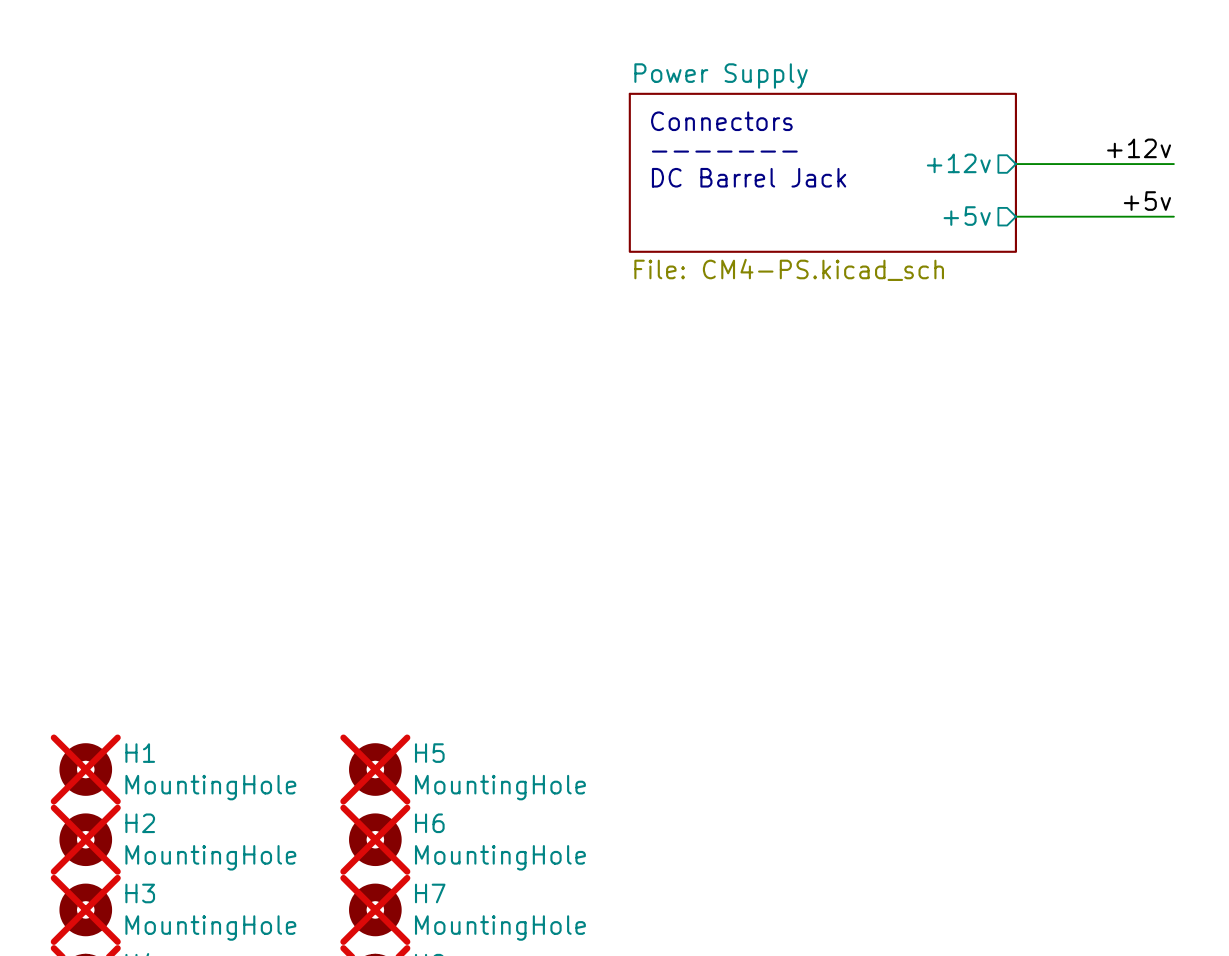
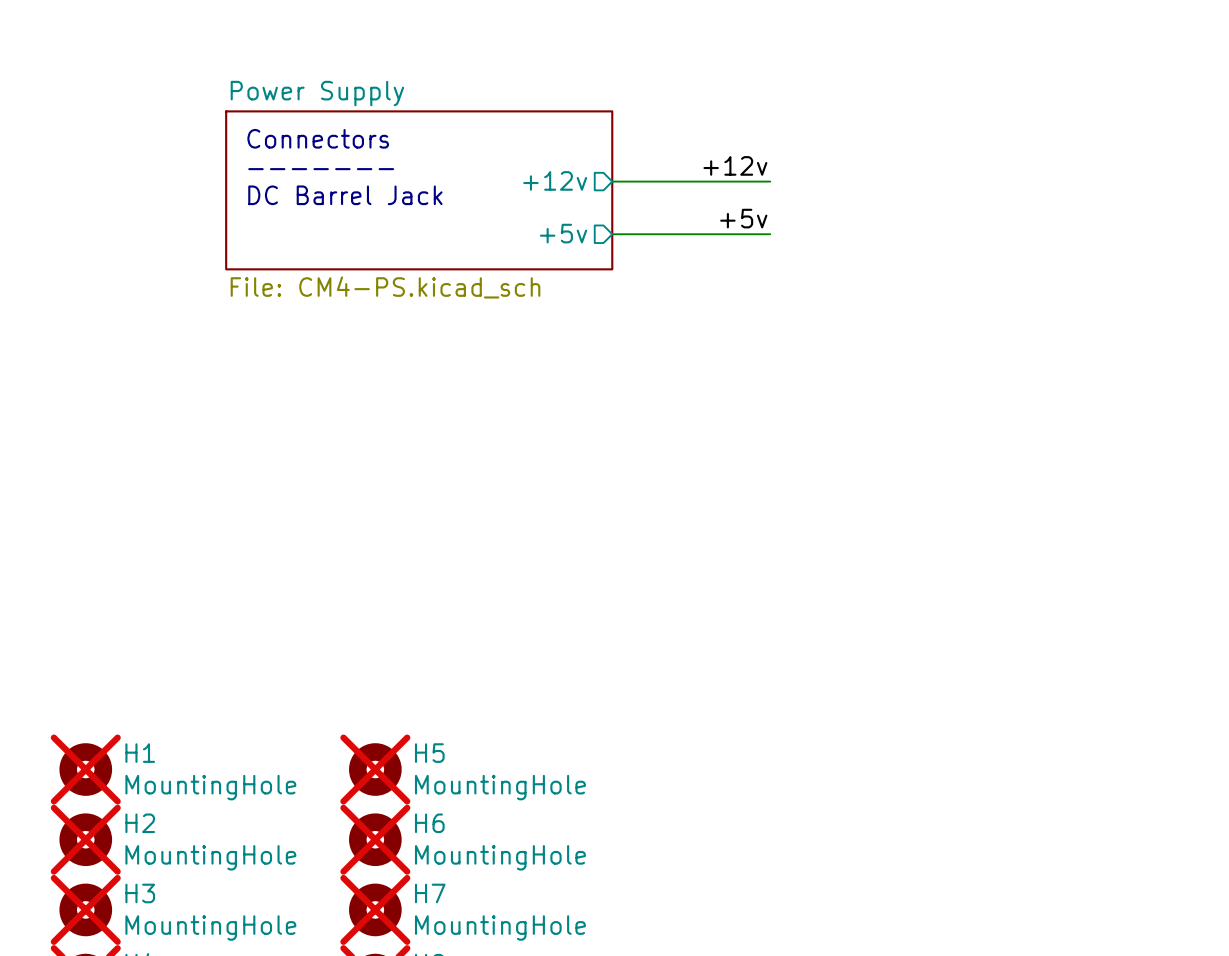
text: Connectors (721, 121) -> none
text: none -> Connectors (318, 138)
label: +12v (1139, 148) -> none
text: ------- (724, 151) -> none
sheet pin: +12v (958, 163) -> none
wire: (1015, 164) (1173, 164) -> none
label: none -> +12v (735, 165)
text: none -> ------- (321, 169)
sheet Power Supply: File: CM4-PS.kicad_sch (822, 172) -> none
text: DC Barrel Jack (749, 177) -> none
sheet pin: none -> +12v (555, 180)
wire: none -> (612, 181) (770, 181)
sheet Power Supply: none -> File: CM4-PS.kicad_sch (419, 190)
text: none -> DC Barrel Jack (345, 195)
label: +5v (1147, 201) -> none
sheet pin: +5v (967, 216) -> none
wire: (1015, 216) (1173, 216) -> none
label: none -> +5v (743, 218)
sheet pin: none -> +5v (563, 233)
wire: none -> (612, 234) (770, 234)

